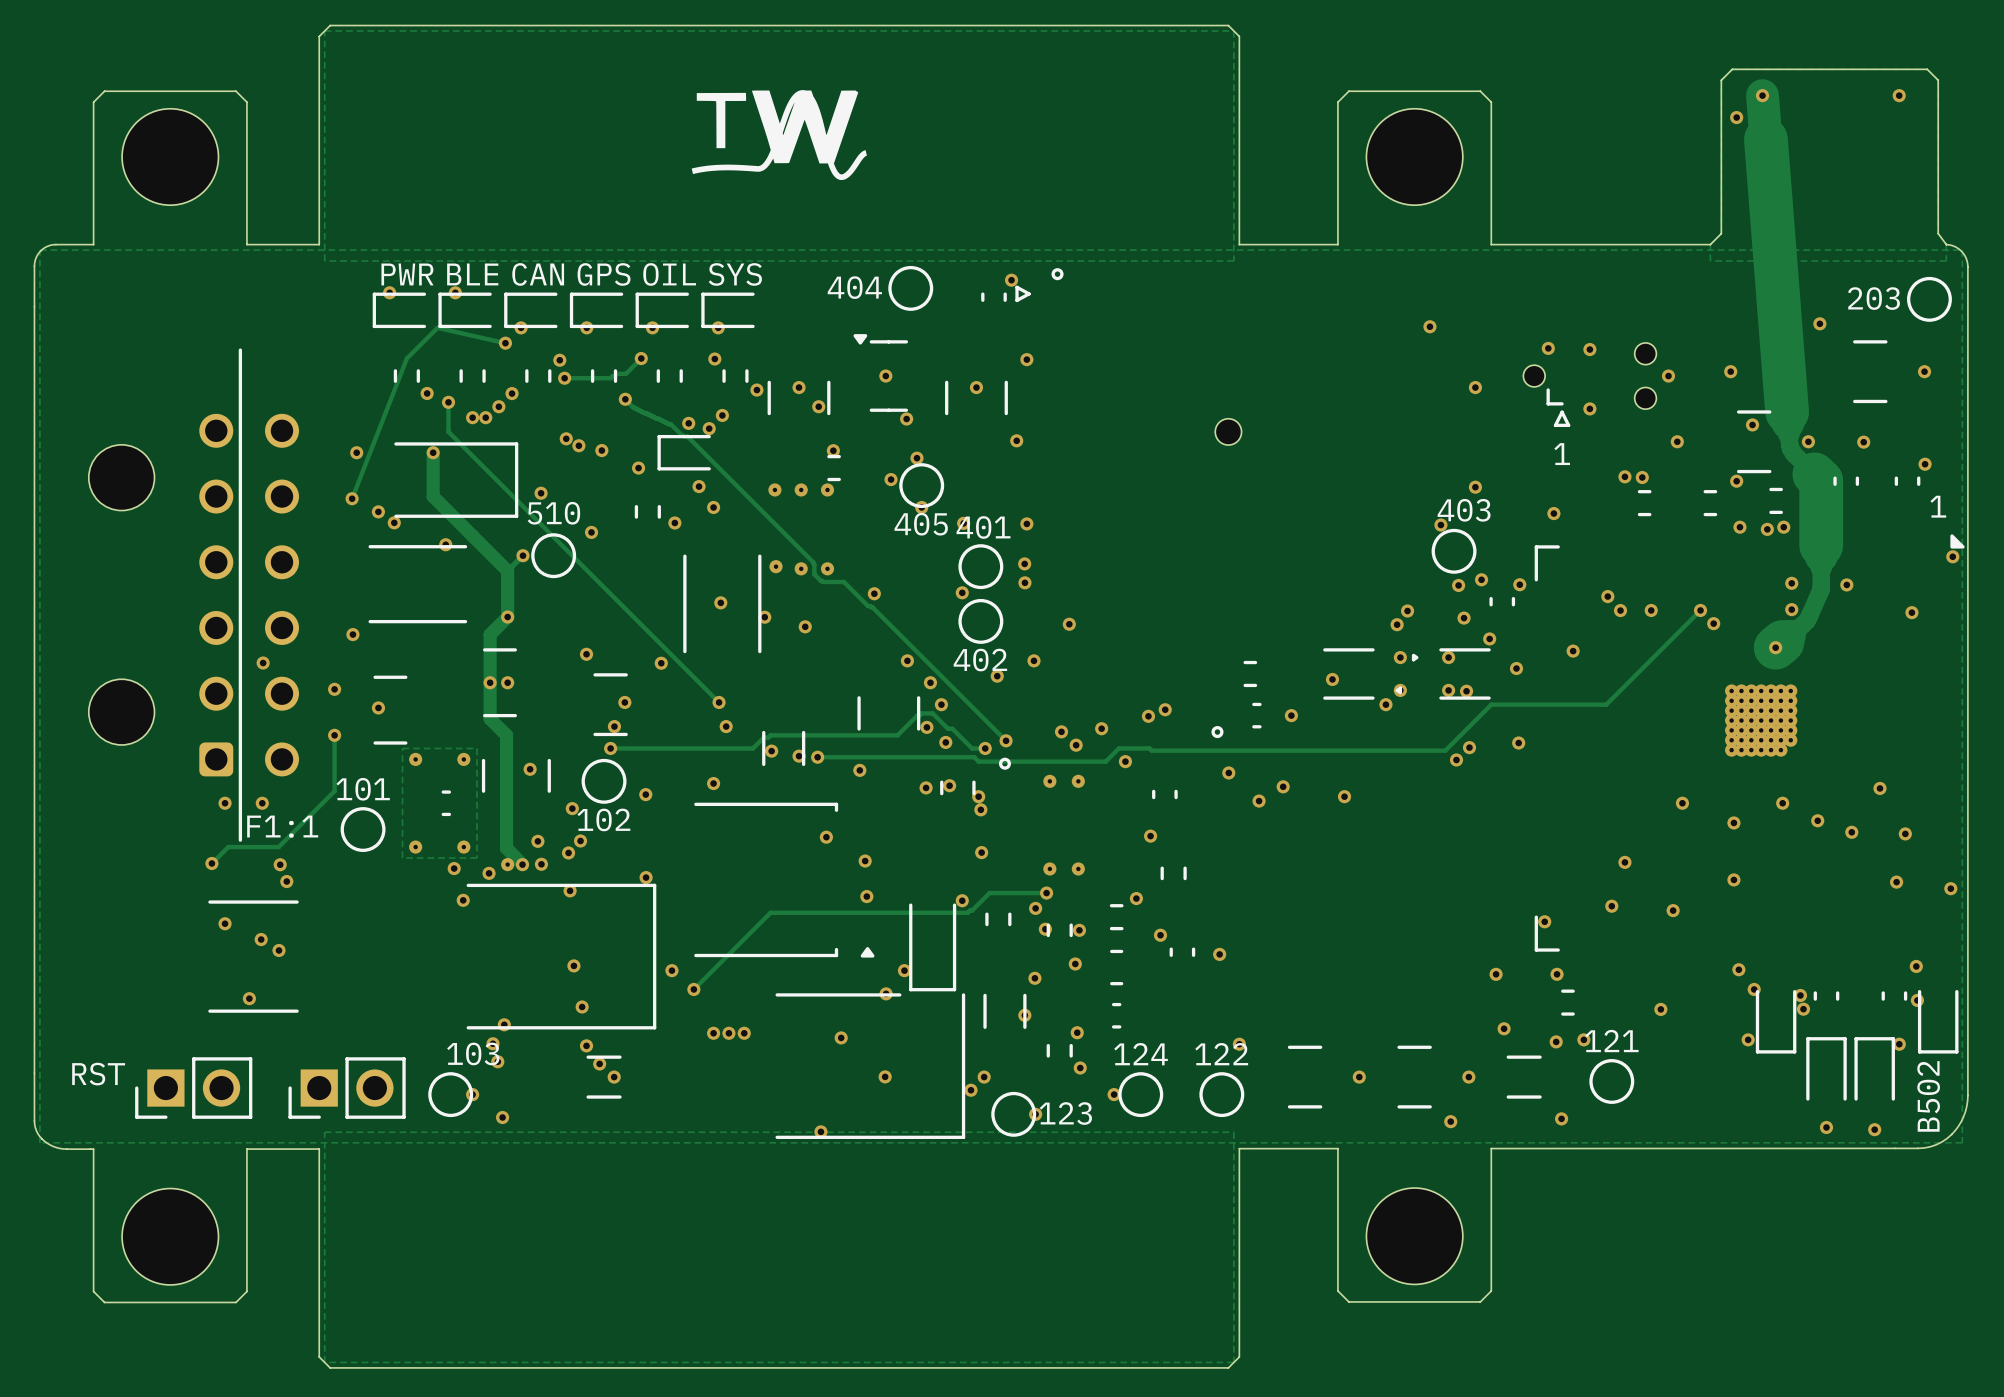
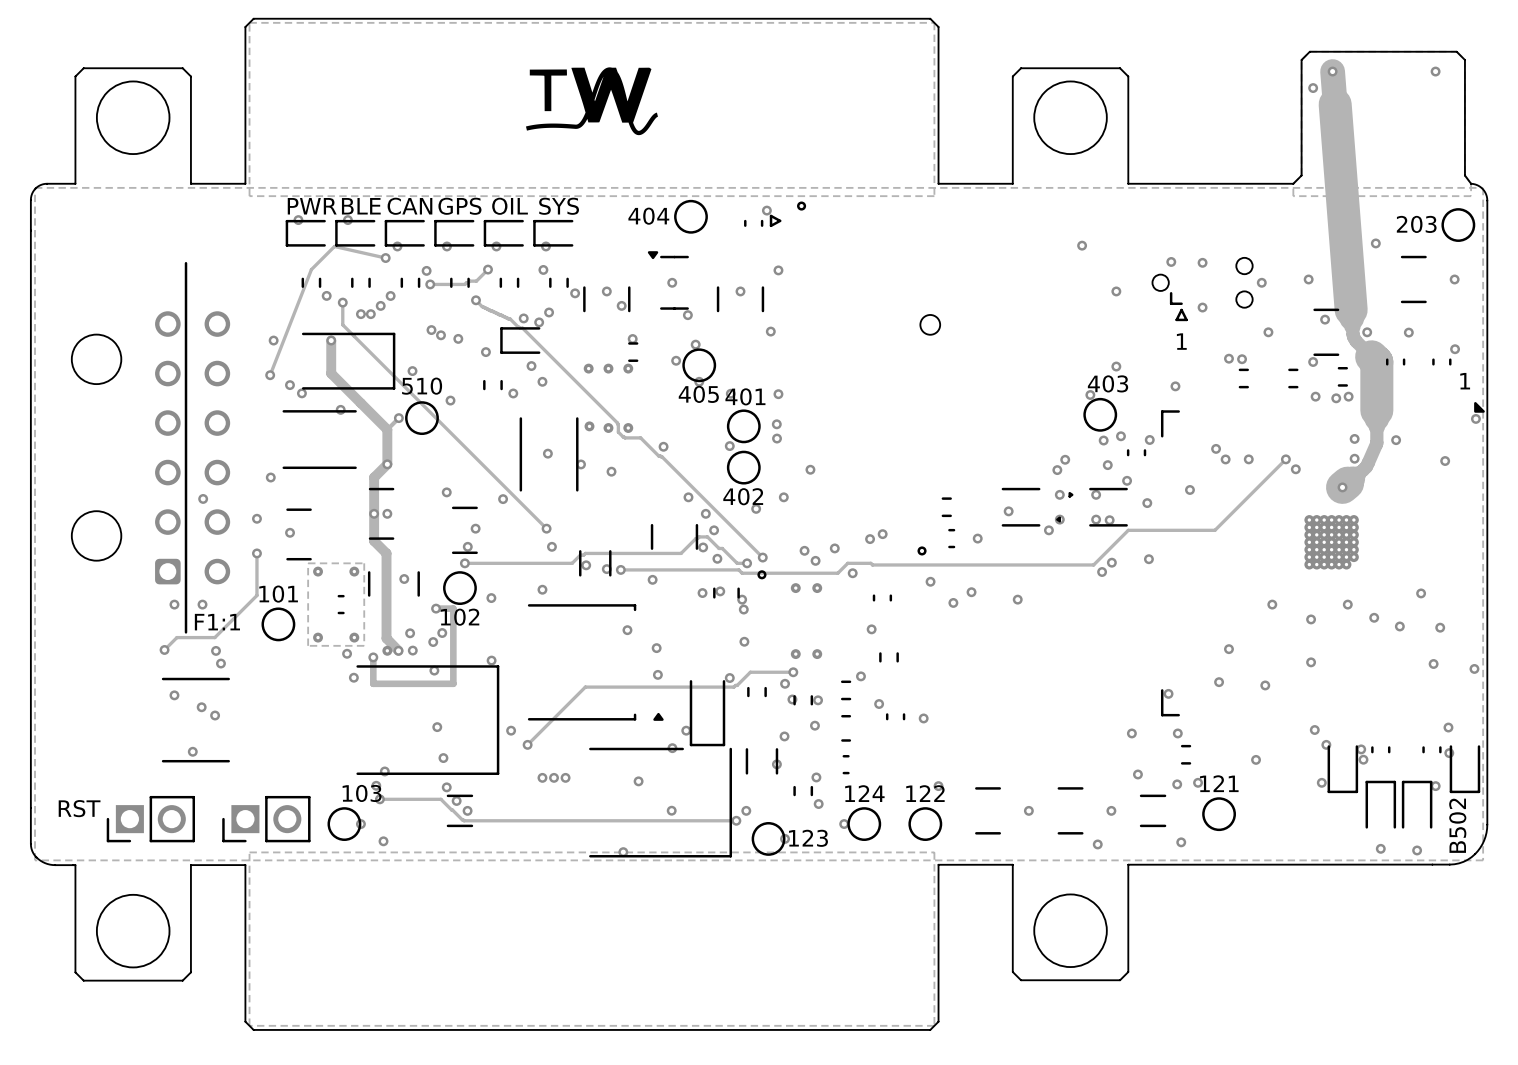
track: none -> (436, 608) (453, 608) (453, 683) (373, 683) (373, 657)
track: none -> (379, 799) (440, 799) (464, 820) (736, 820)

